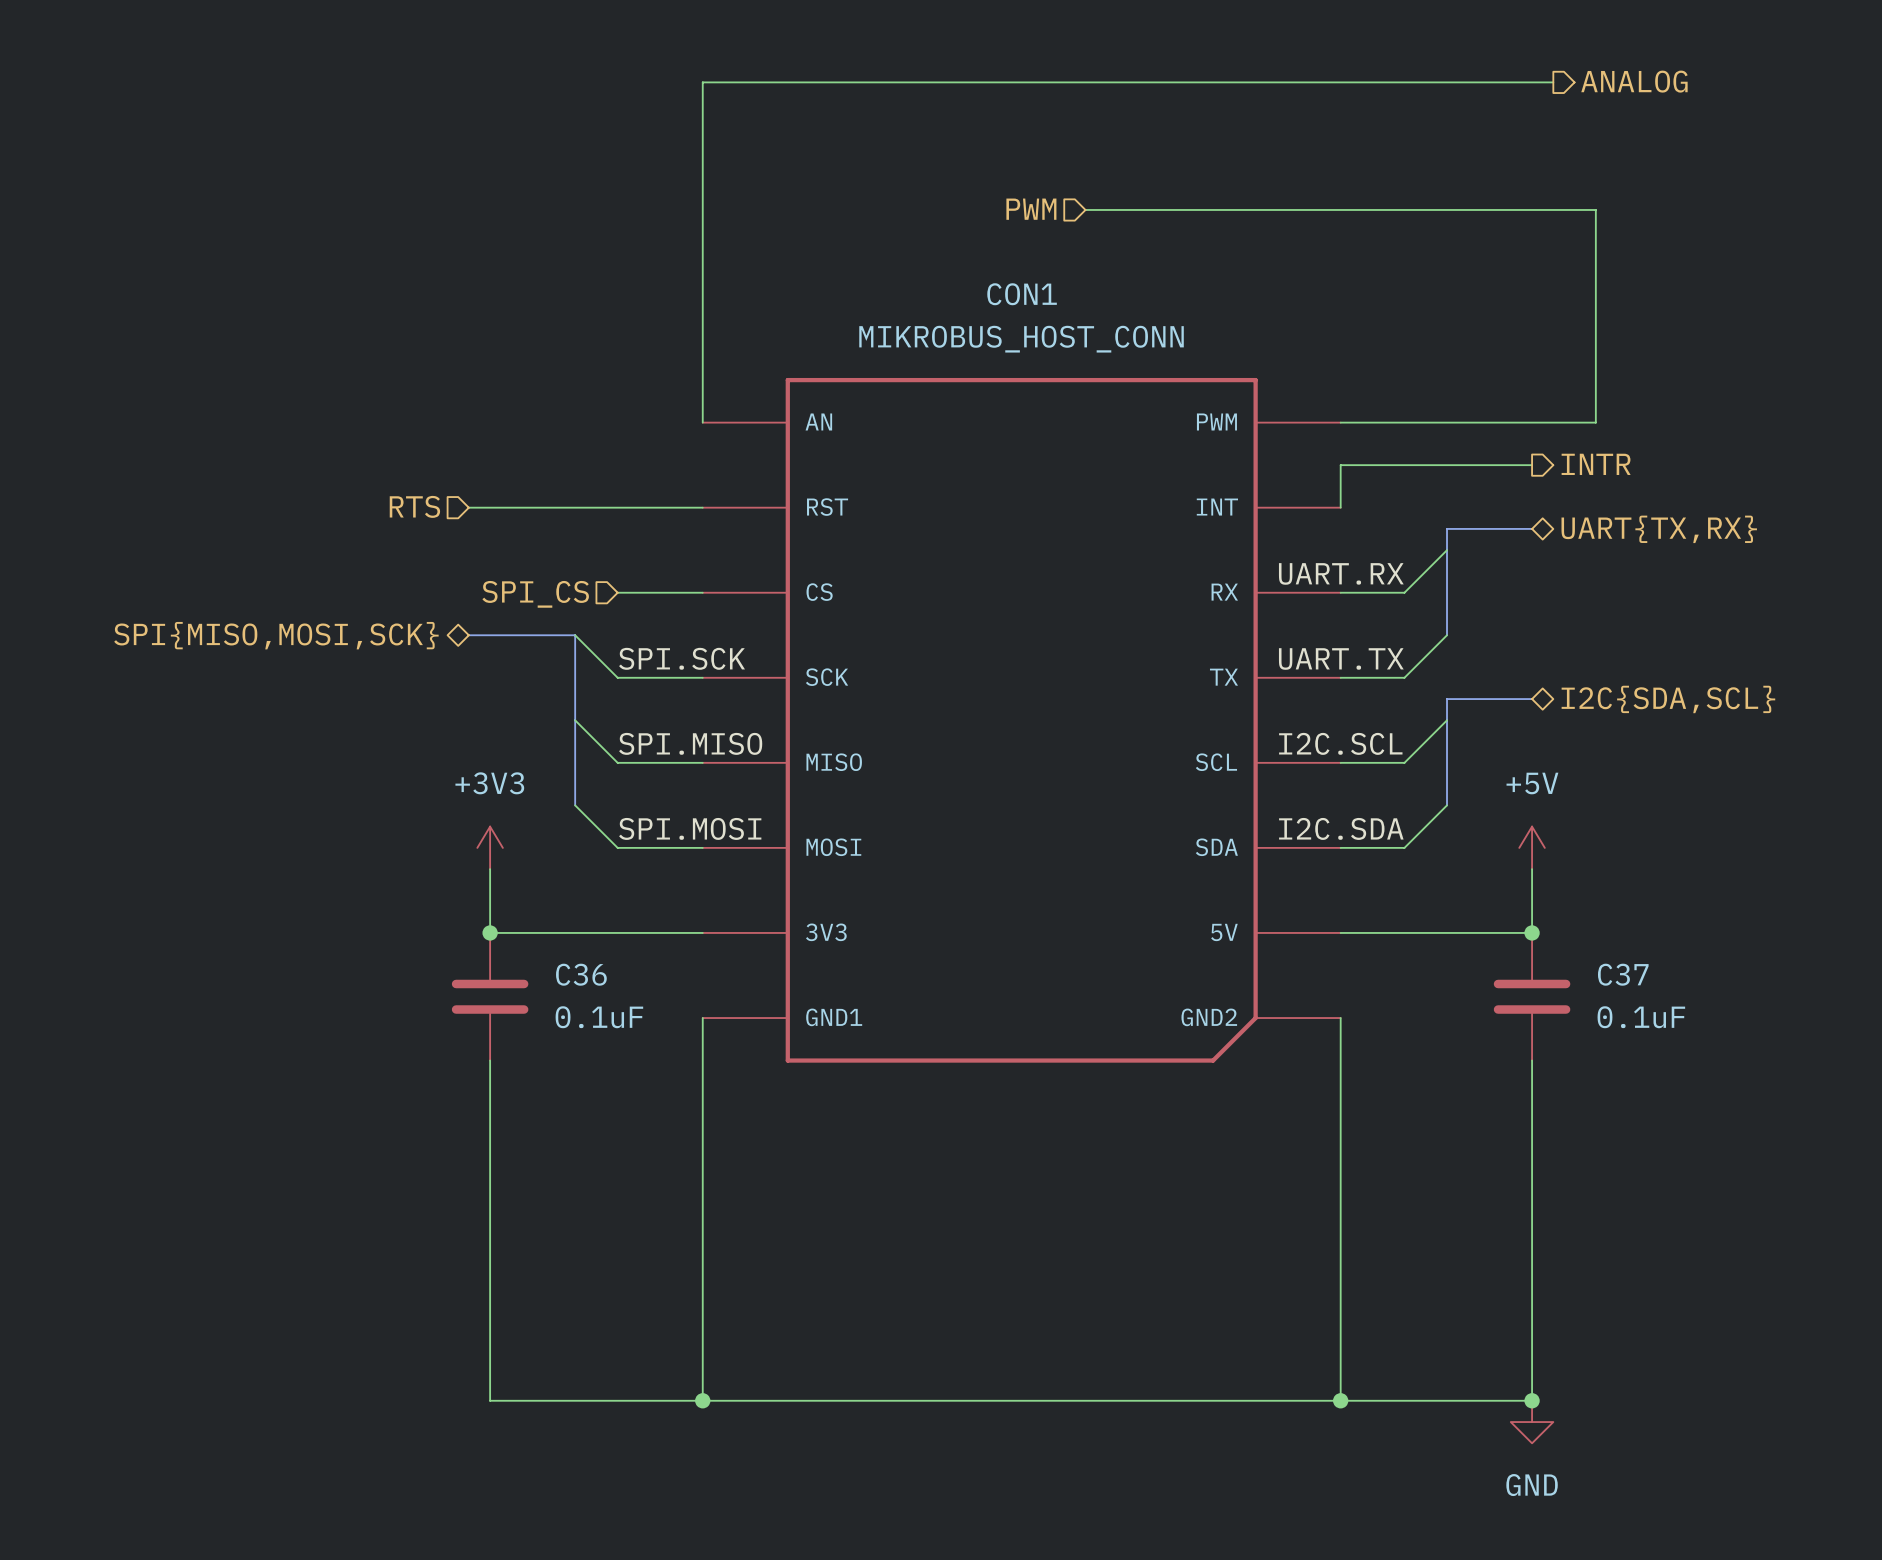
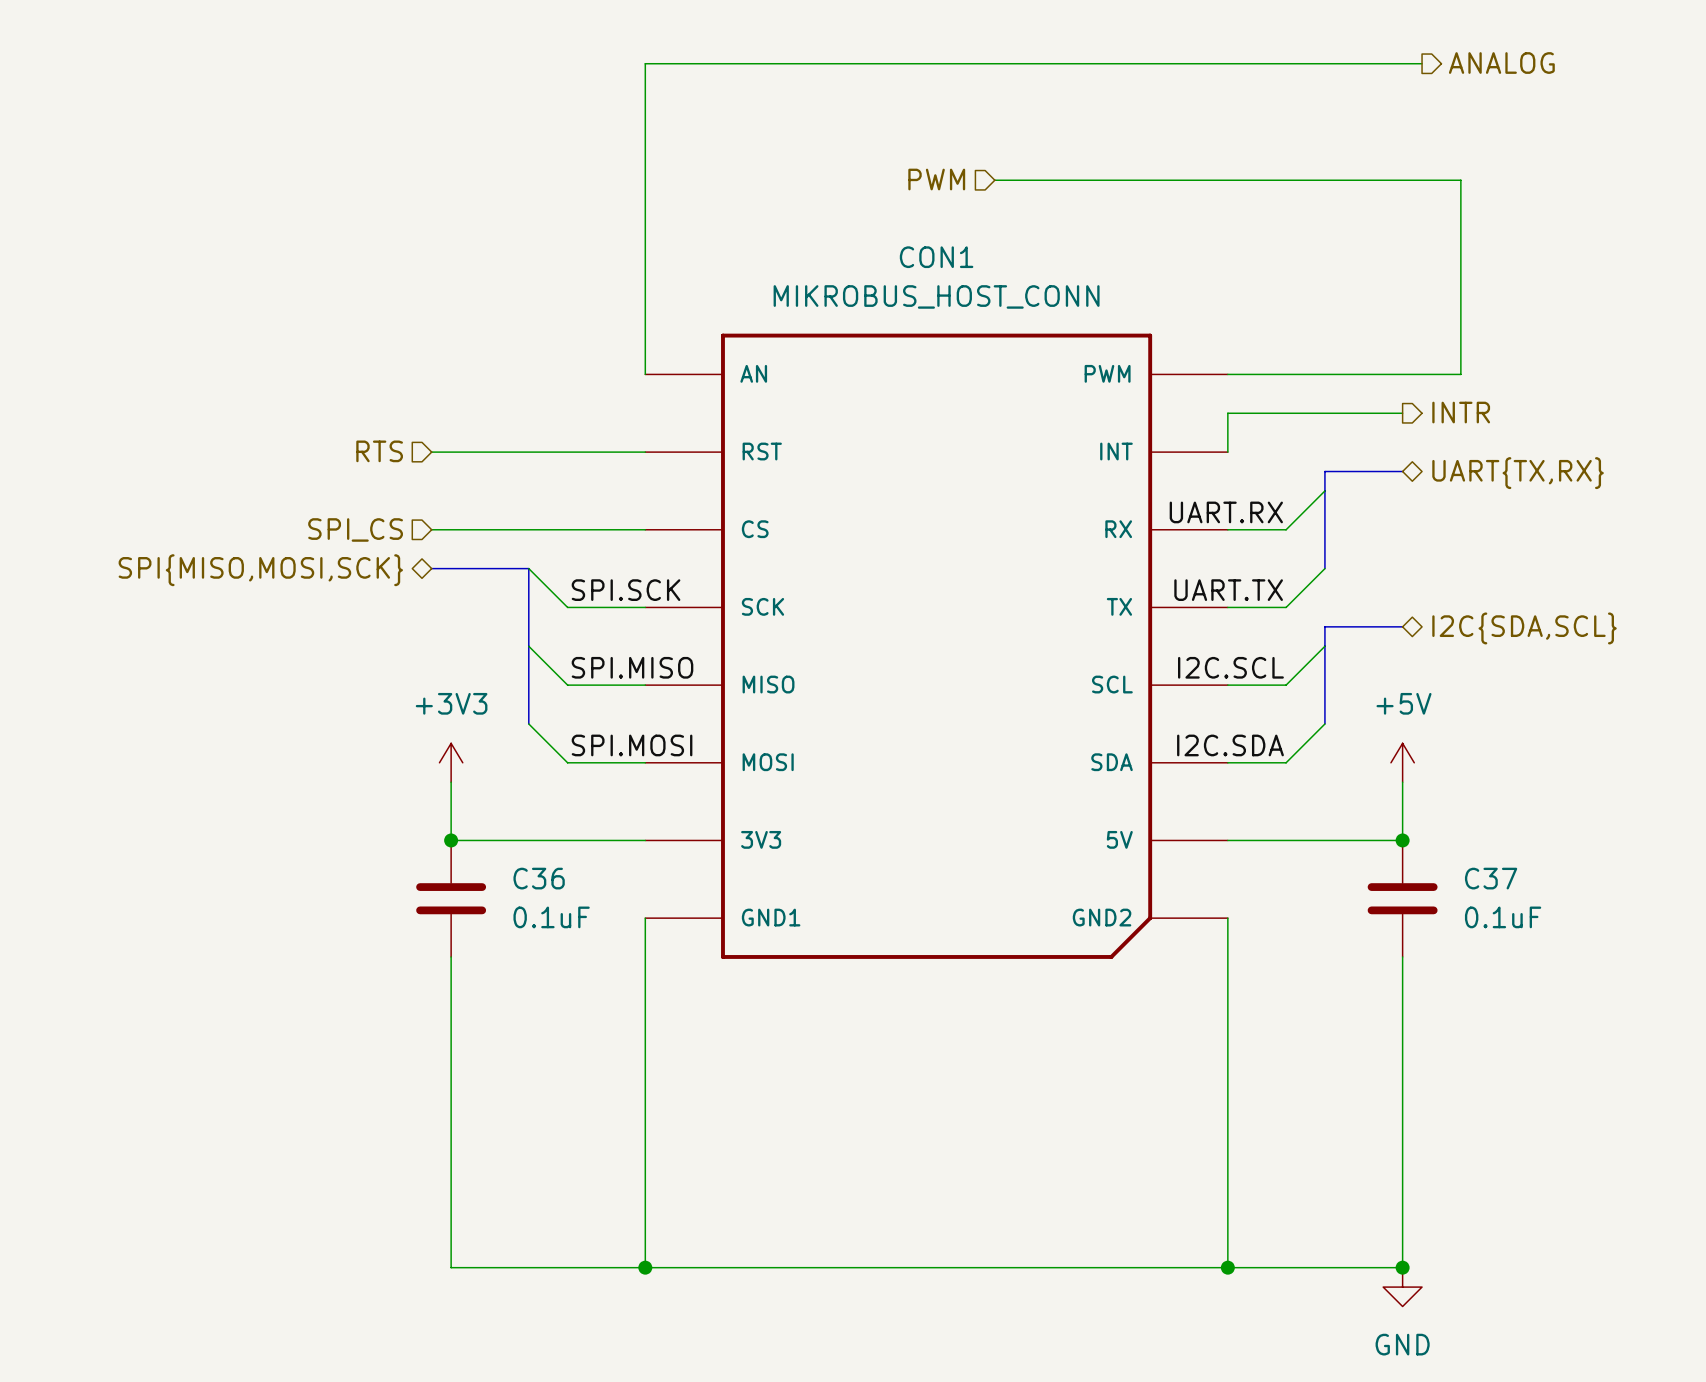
wire: none -> (431, 529) (567, 529)
hierarchical label position: SPI_CS (535, 594) -> SPI_CS (355, 529)

